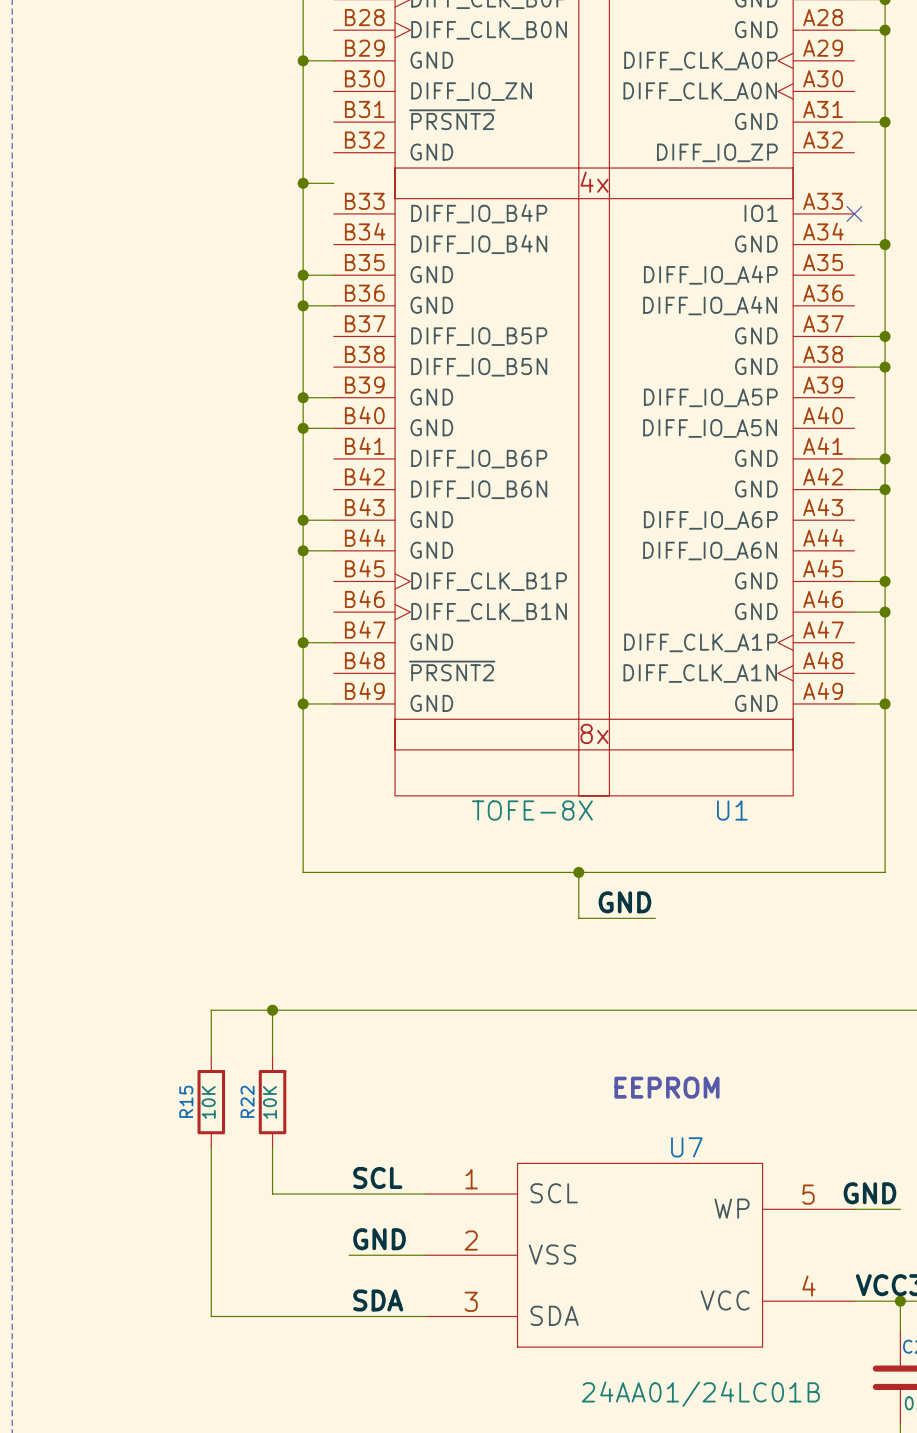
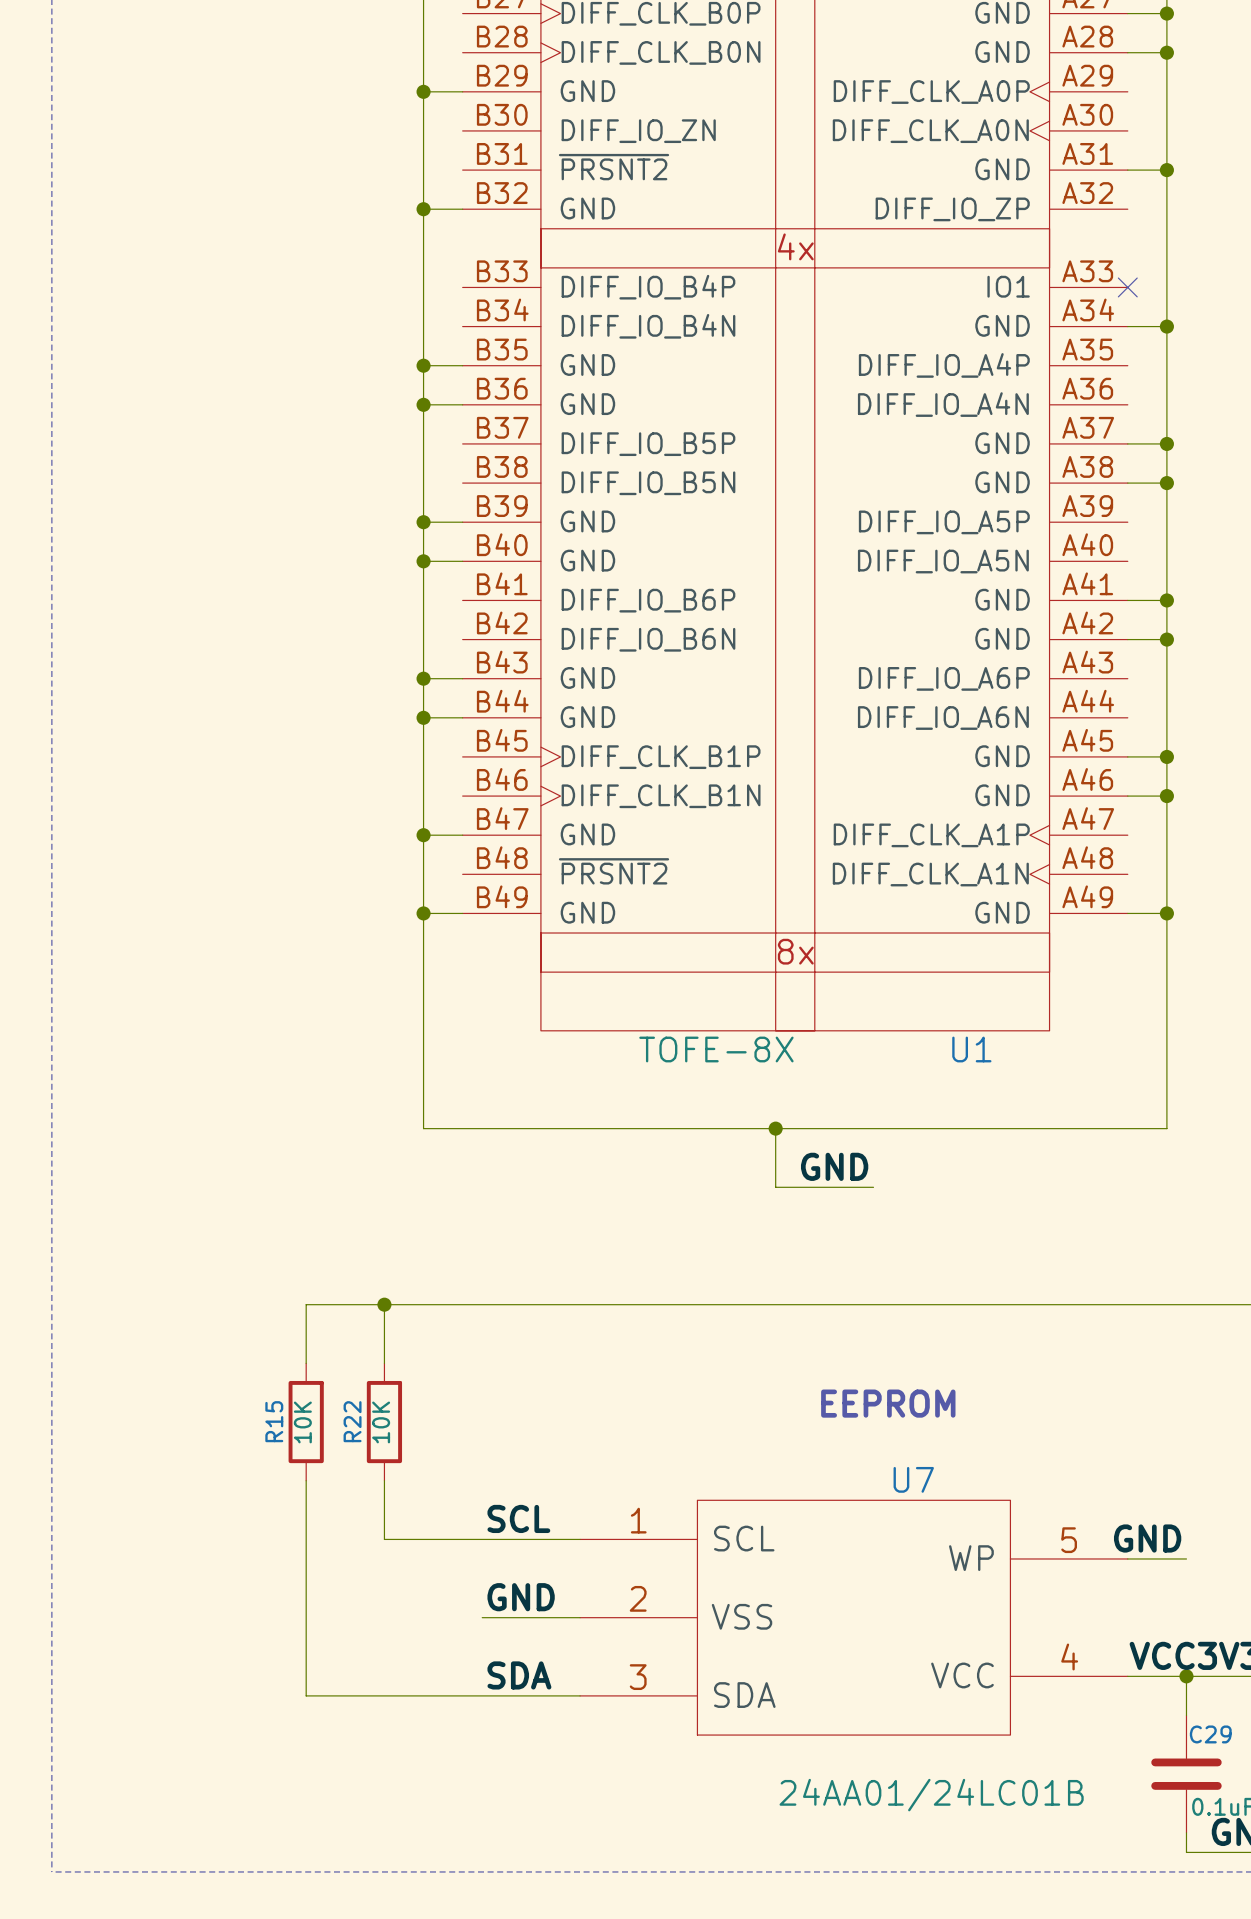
wire: (303, 183) (333, 183) -> (423, 209) (462, 209)
junction position: (303, 183) -> (423, 209)

